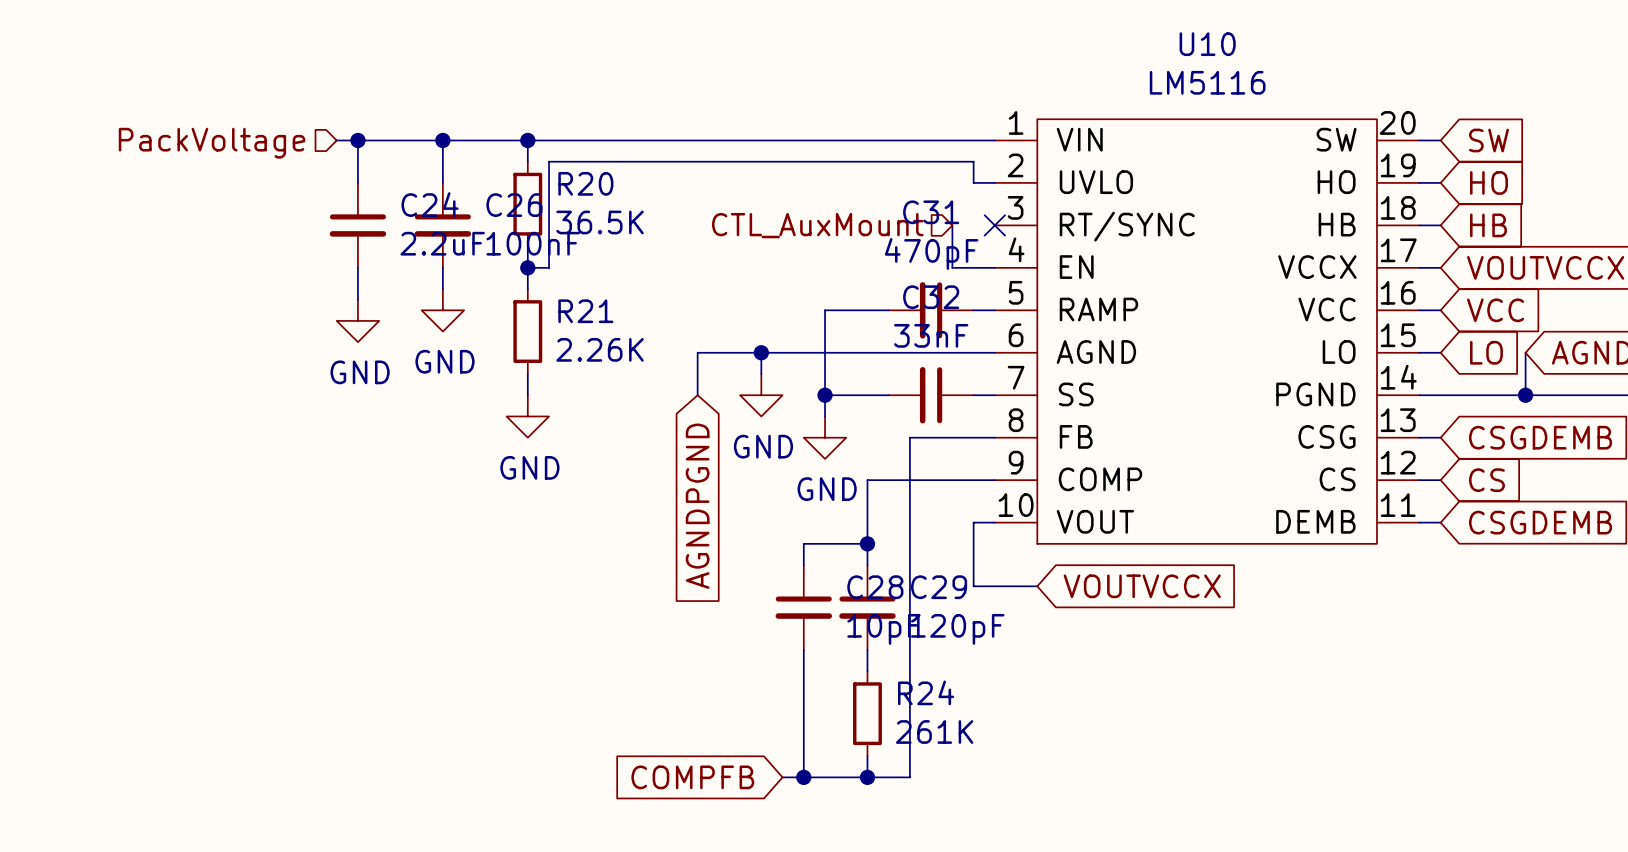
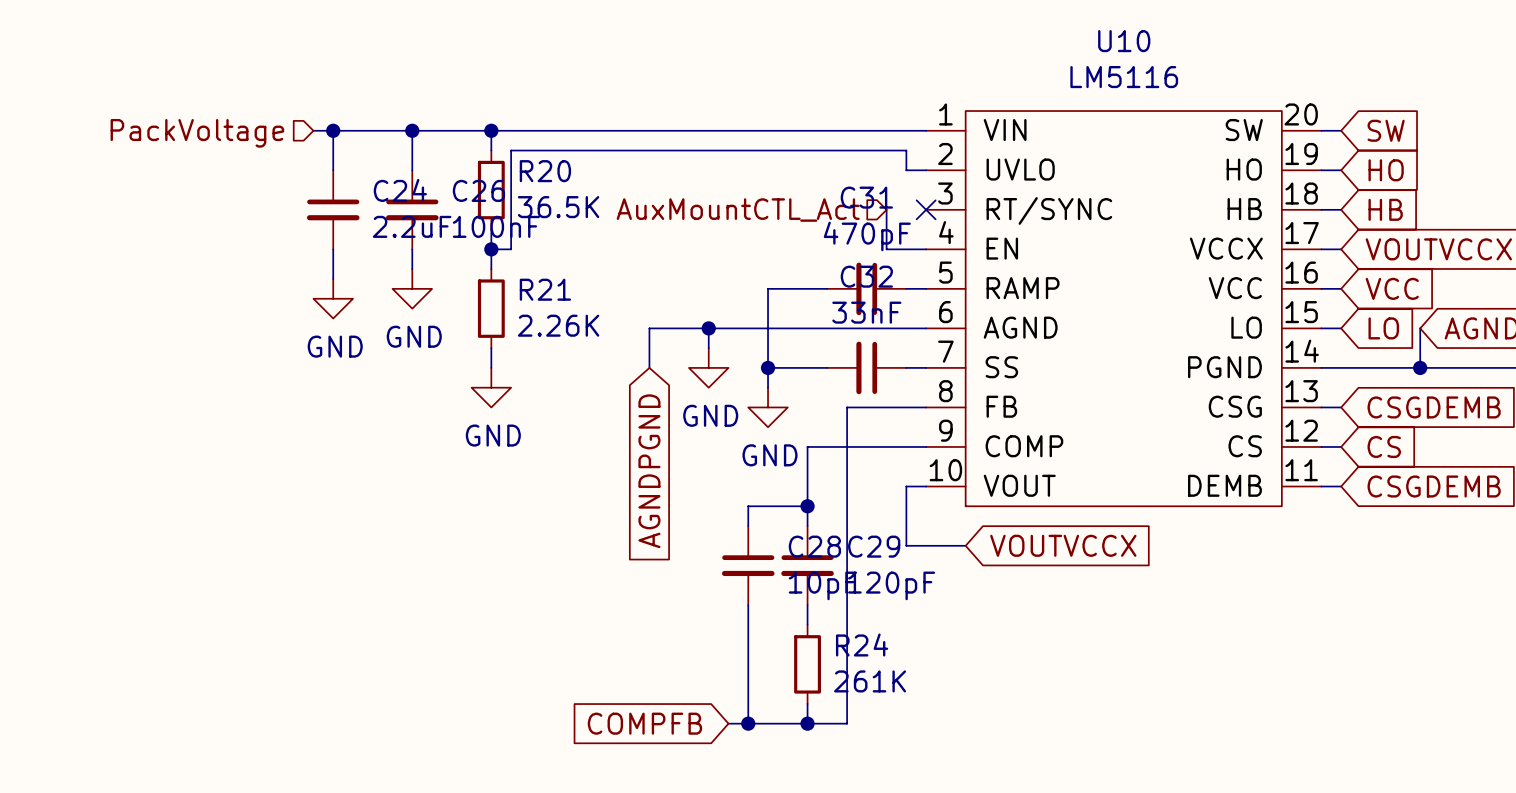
hierarchical label: CTL_AuxMount (817, 225) -> AuxMountCTL_Act (738, 210)

